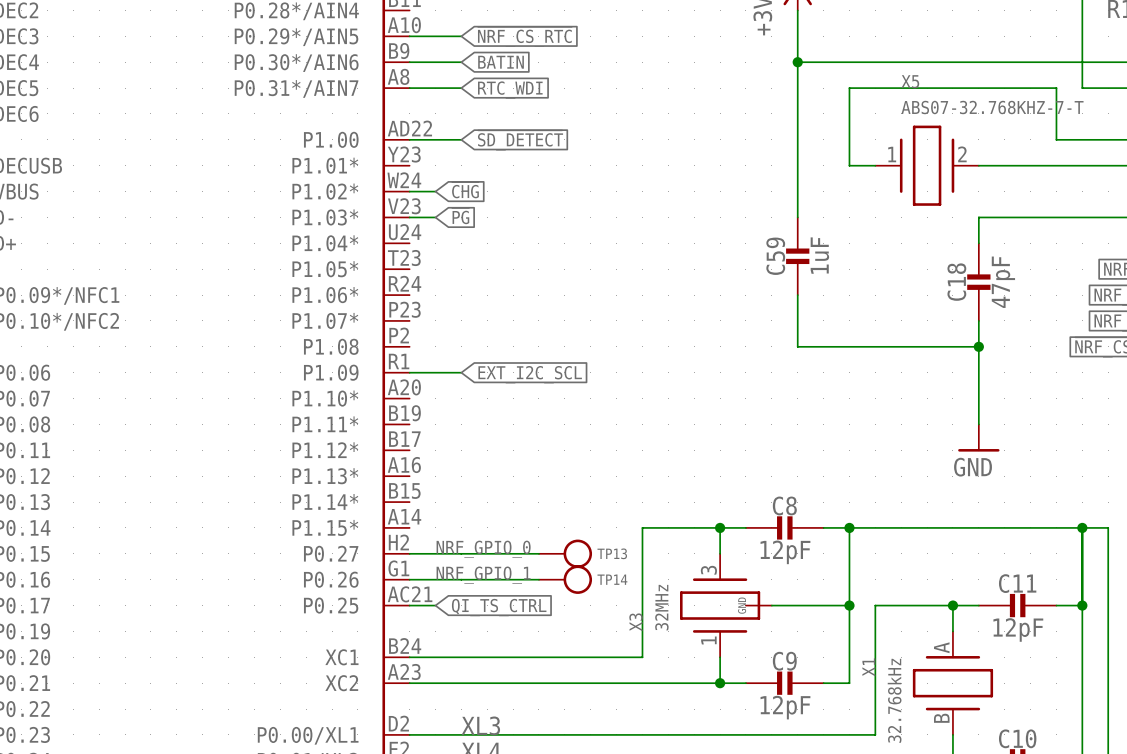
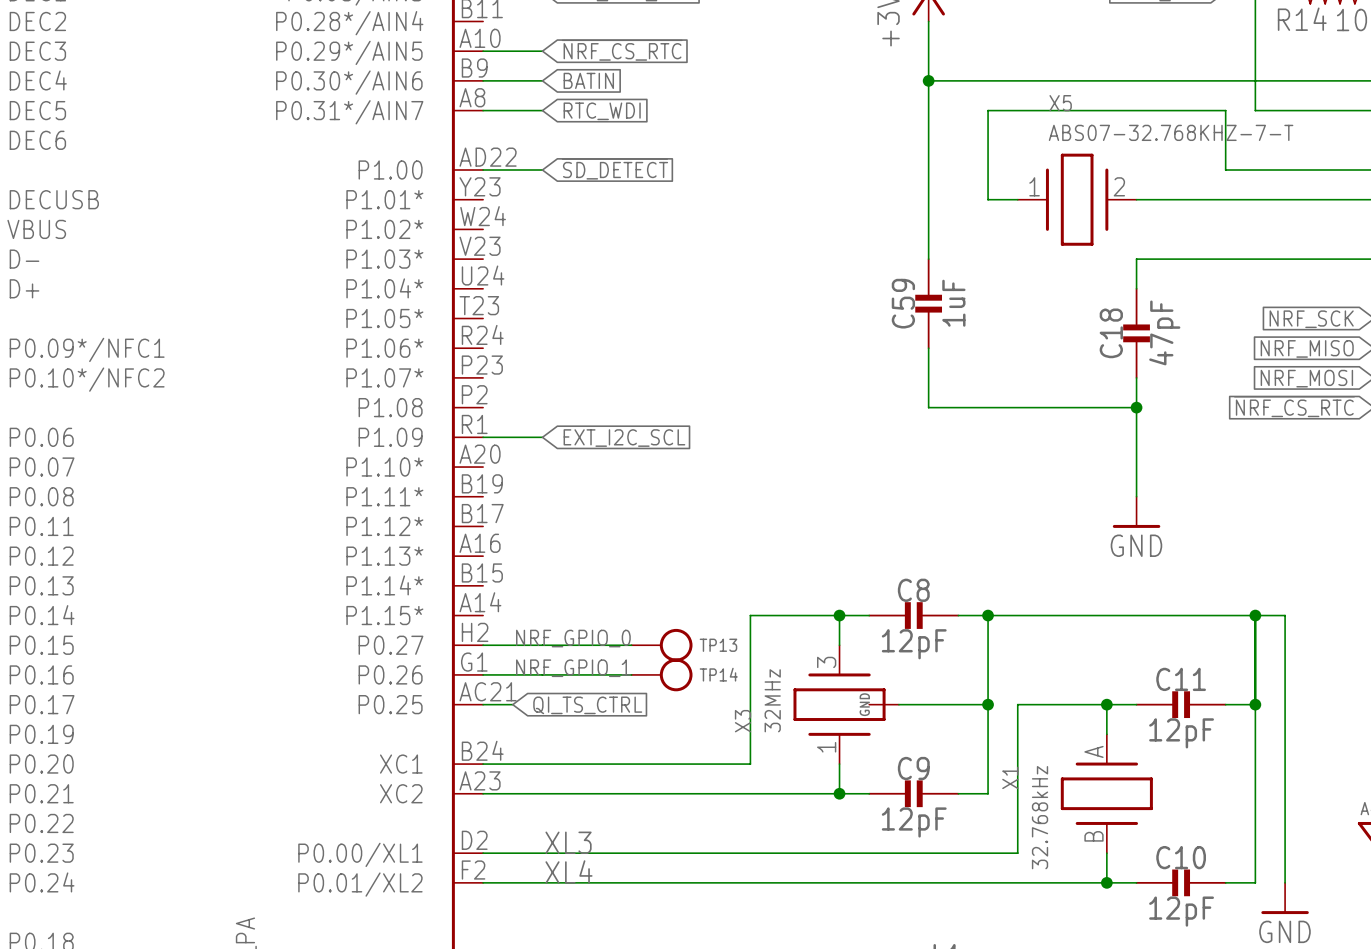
global label: ~{CHG} (465, 190) -> none
wire: (409, 191) (435, 191) -> none
global label: ~{PG} (460, 216) -> none
wire: (409, 217) (435, 217) -> none

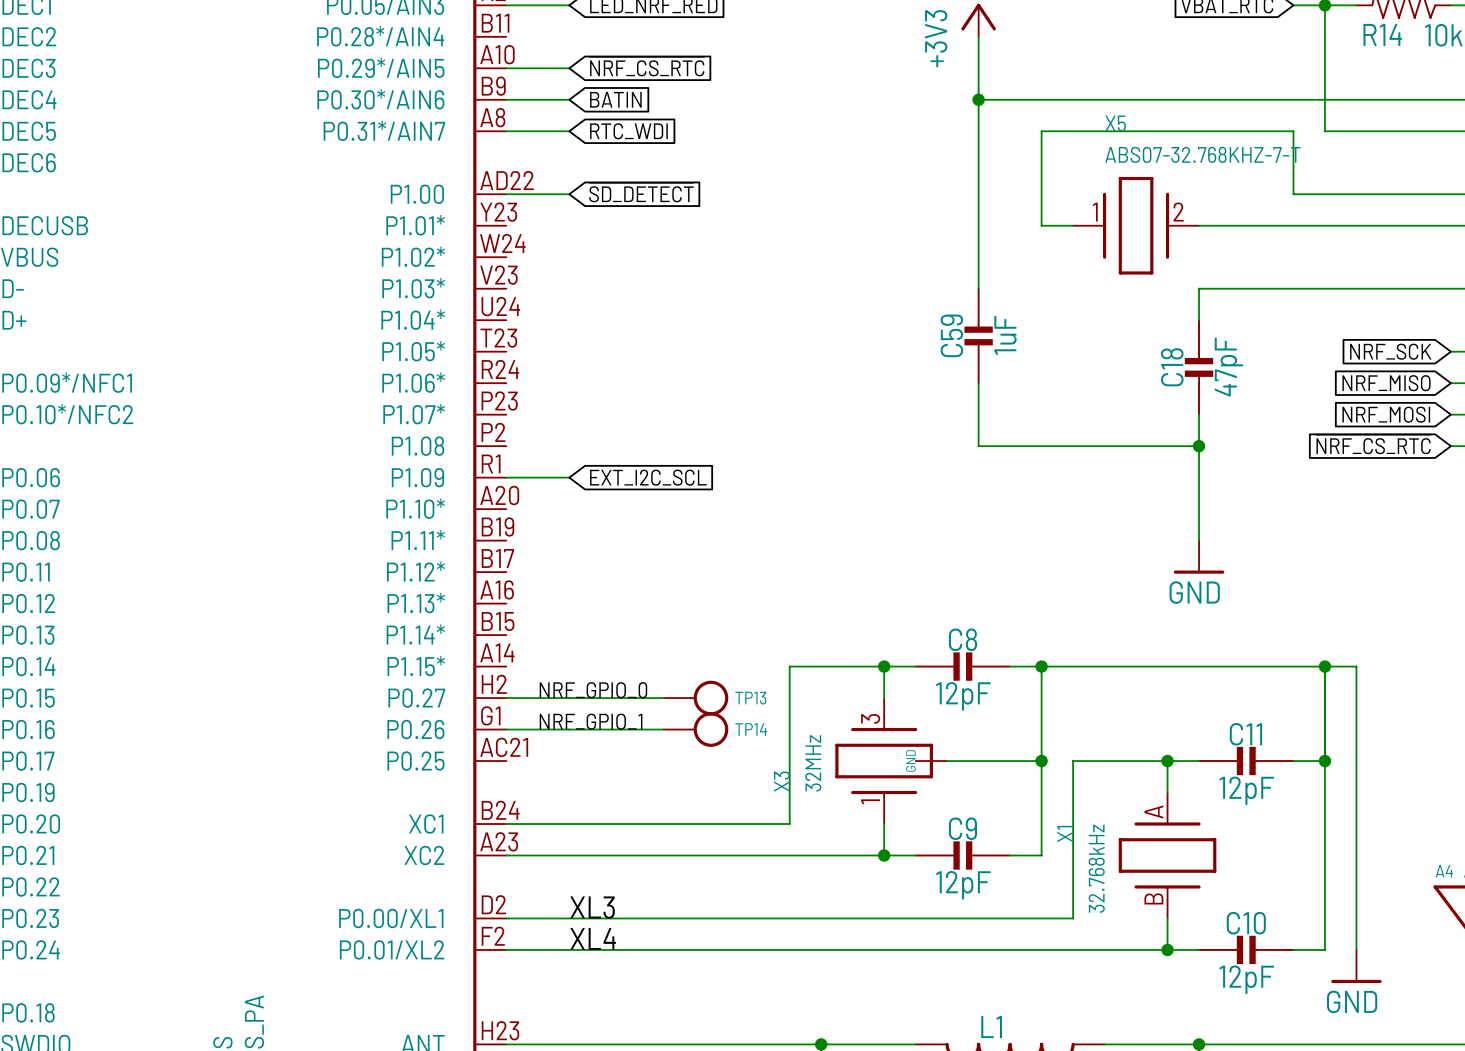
wire: (483, 704) (512, 704) -> none
global label: QI_TS_CTRL (587, 705) -> none

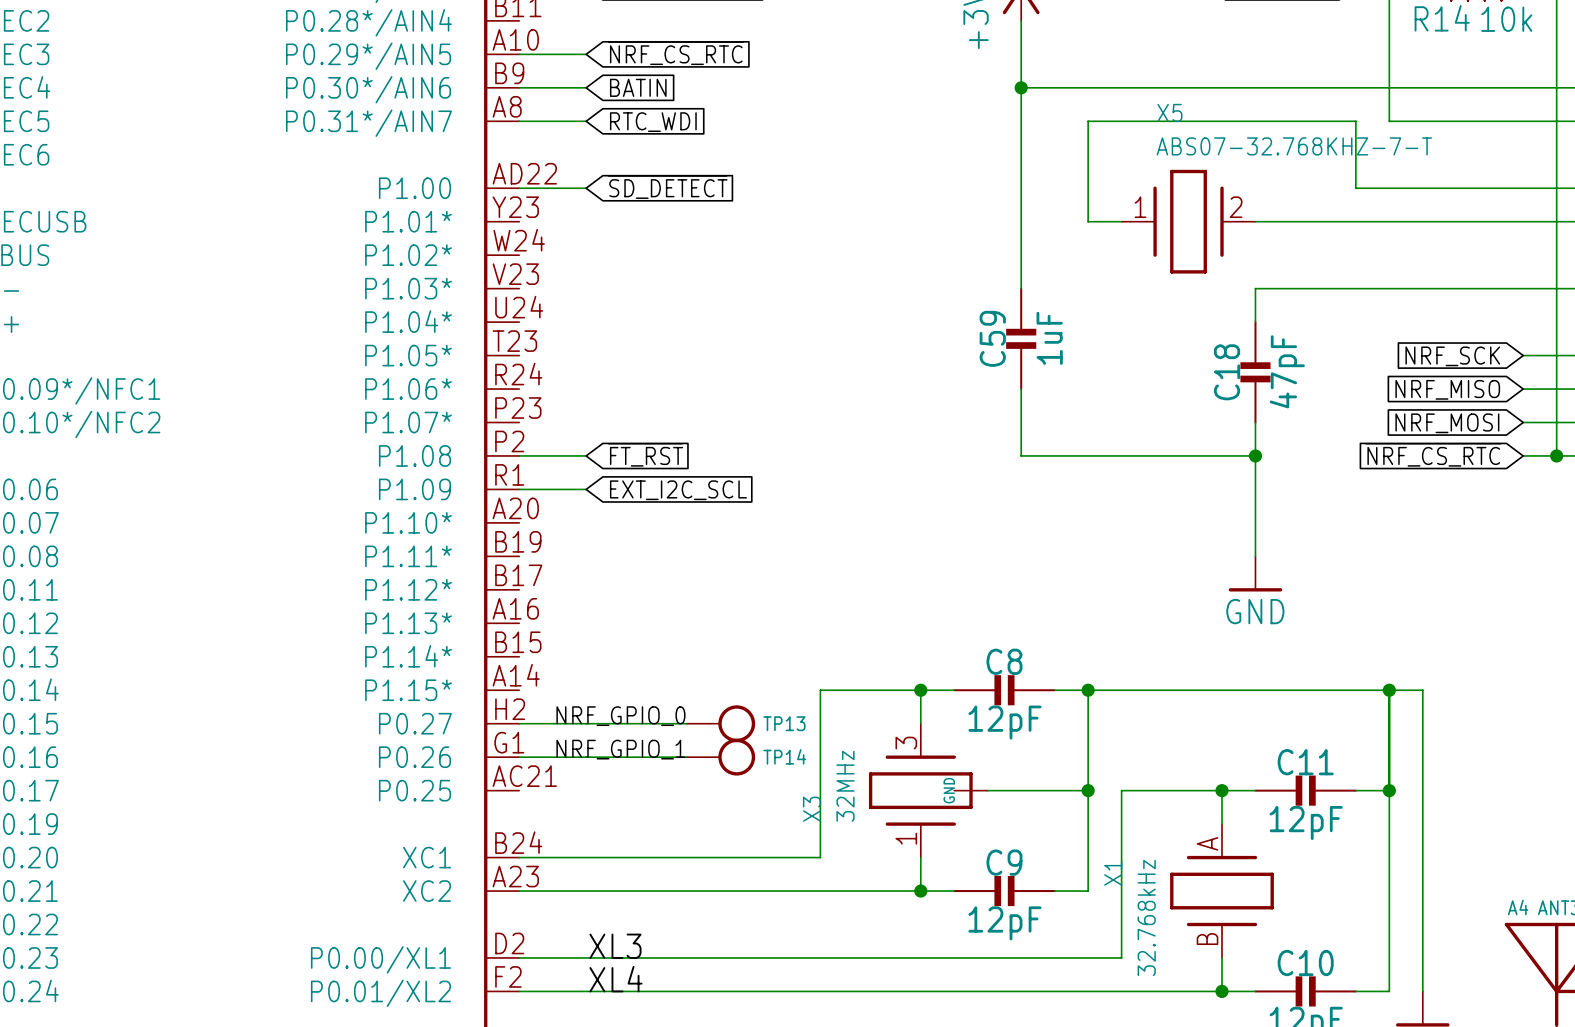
global label: none -> ~{FT_RST} (645, 454)
wire: none -> (519, 455) (586, 455)

